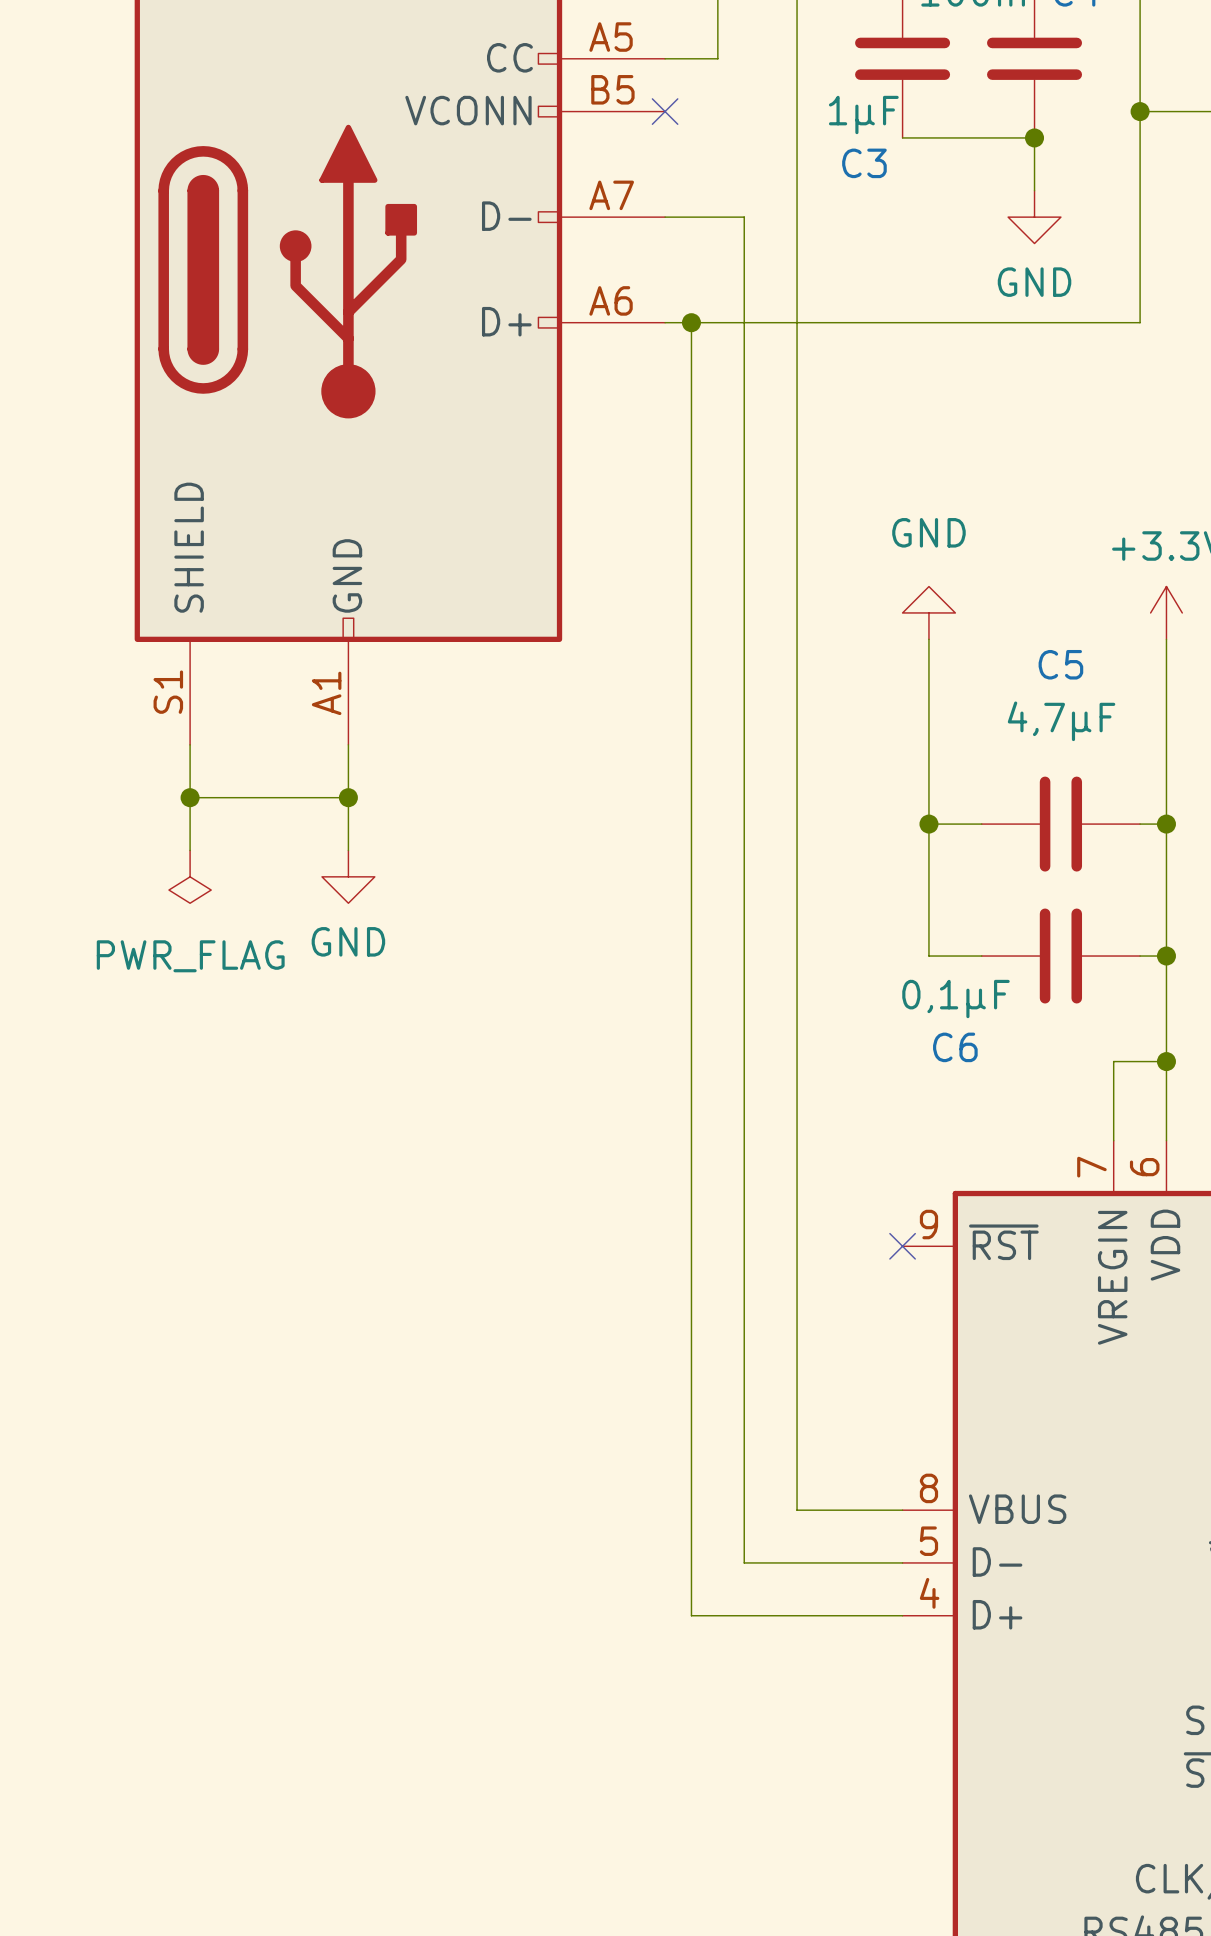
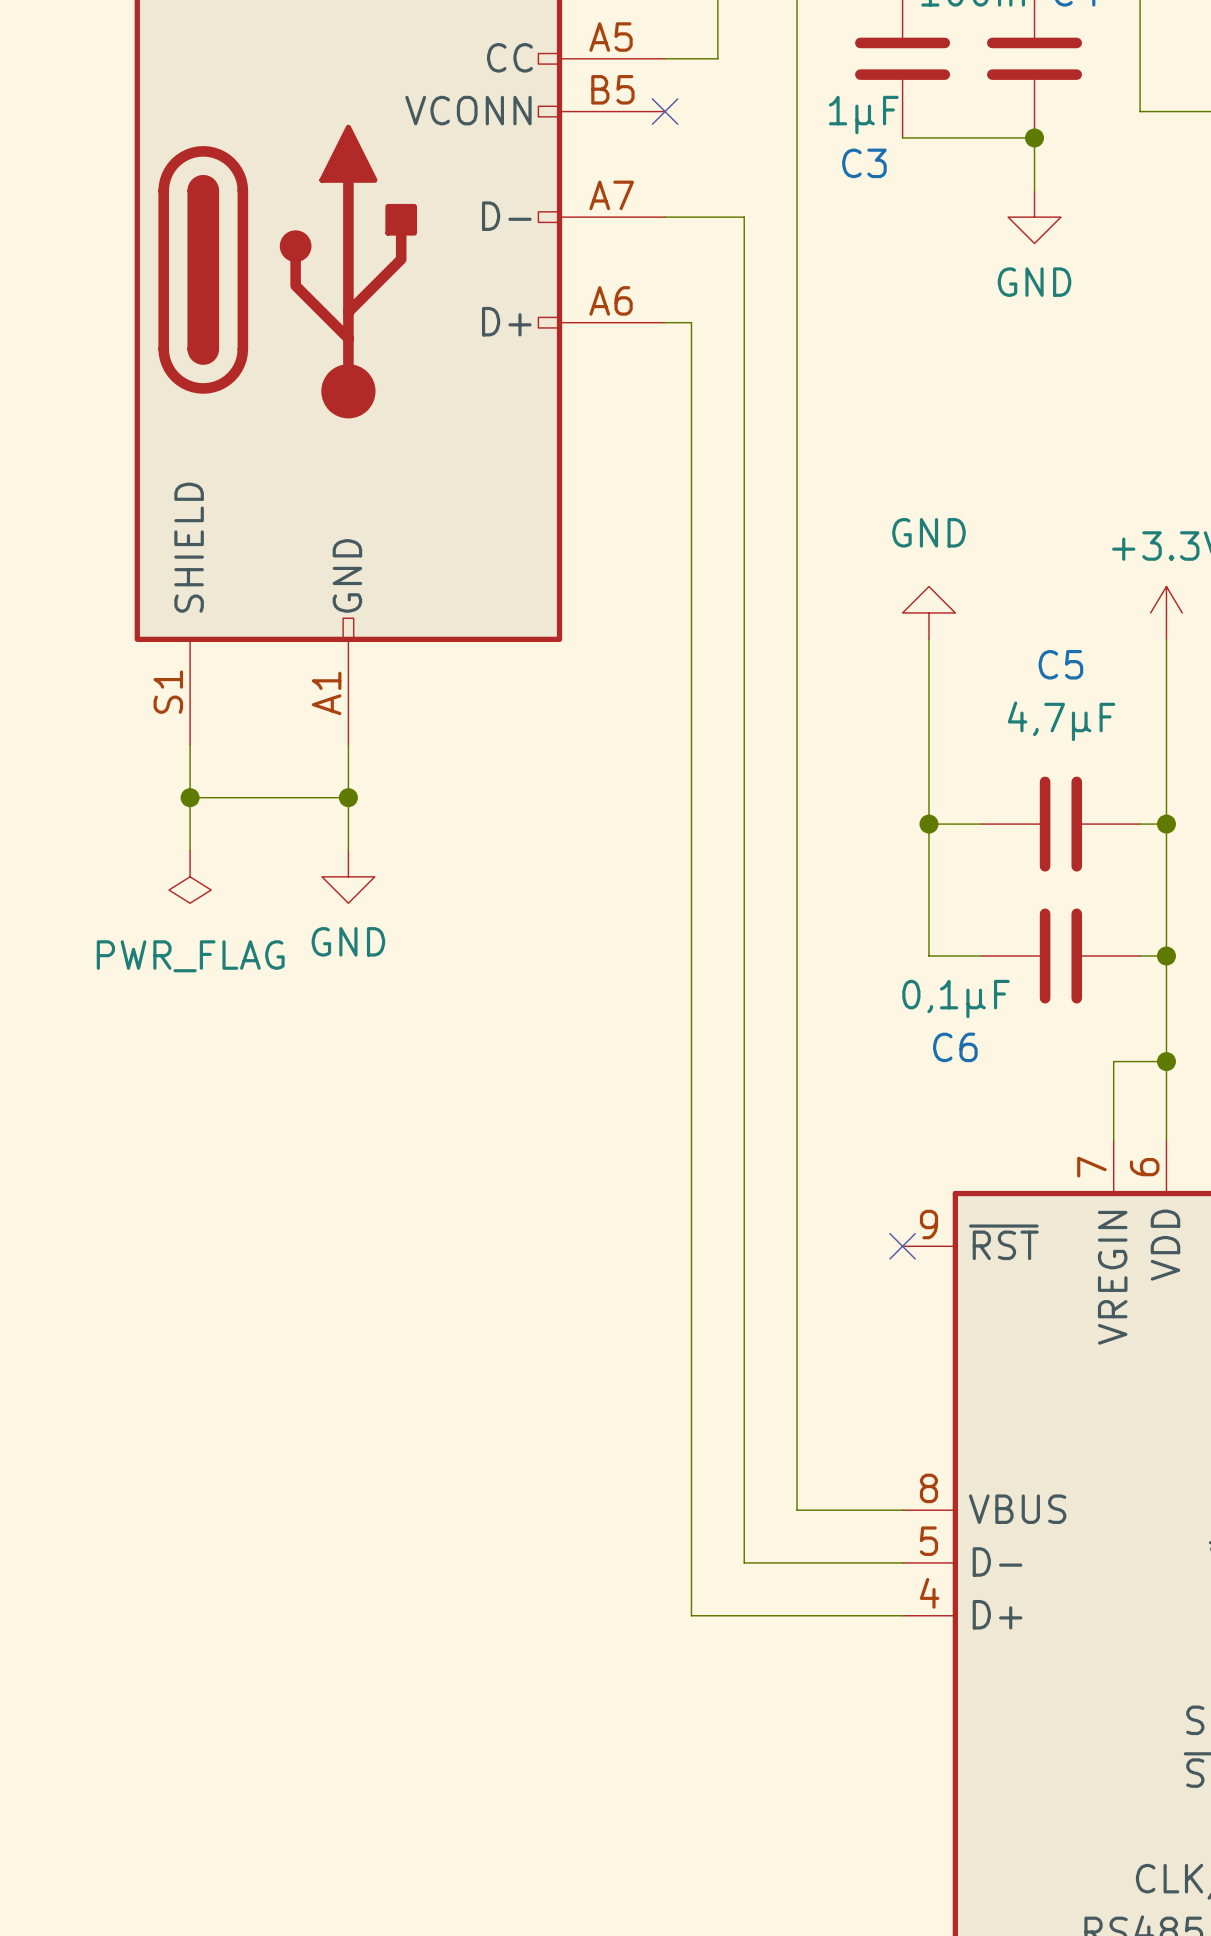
wire: (1140, 111) (1140, 322) (691, 322) -> none
junction: (1140, 111) -> none
junction: (691, 322) -> none

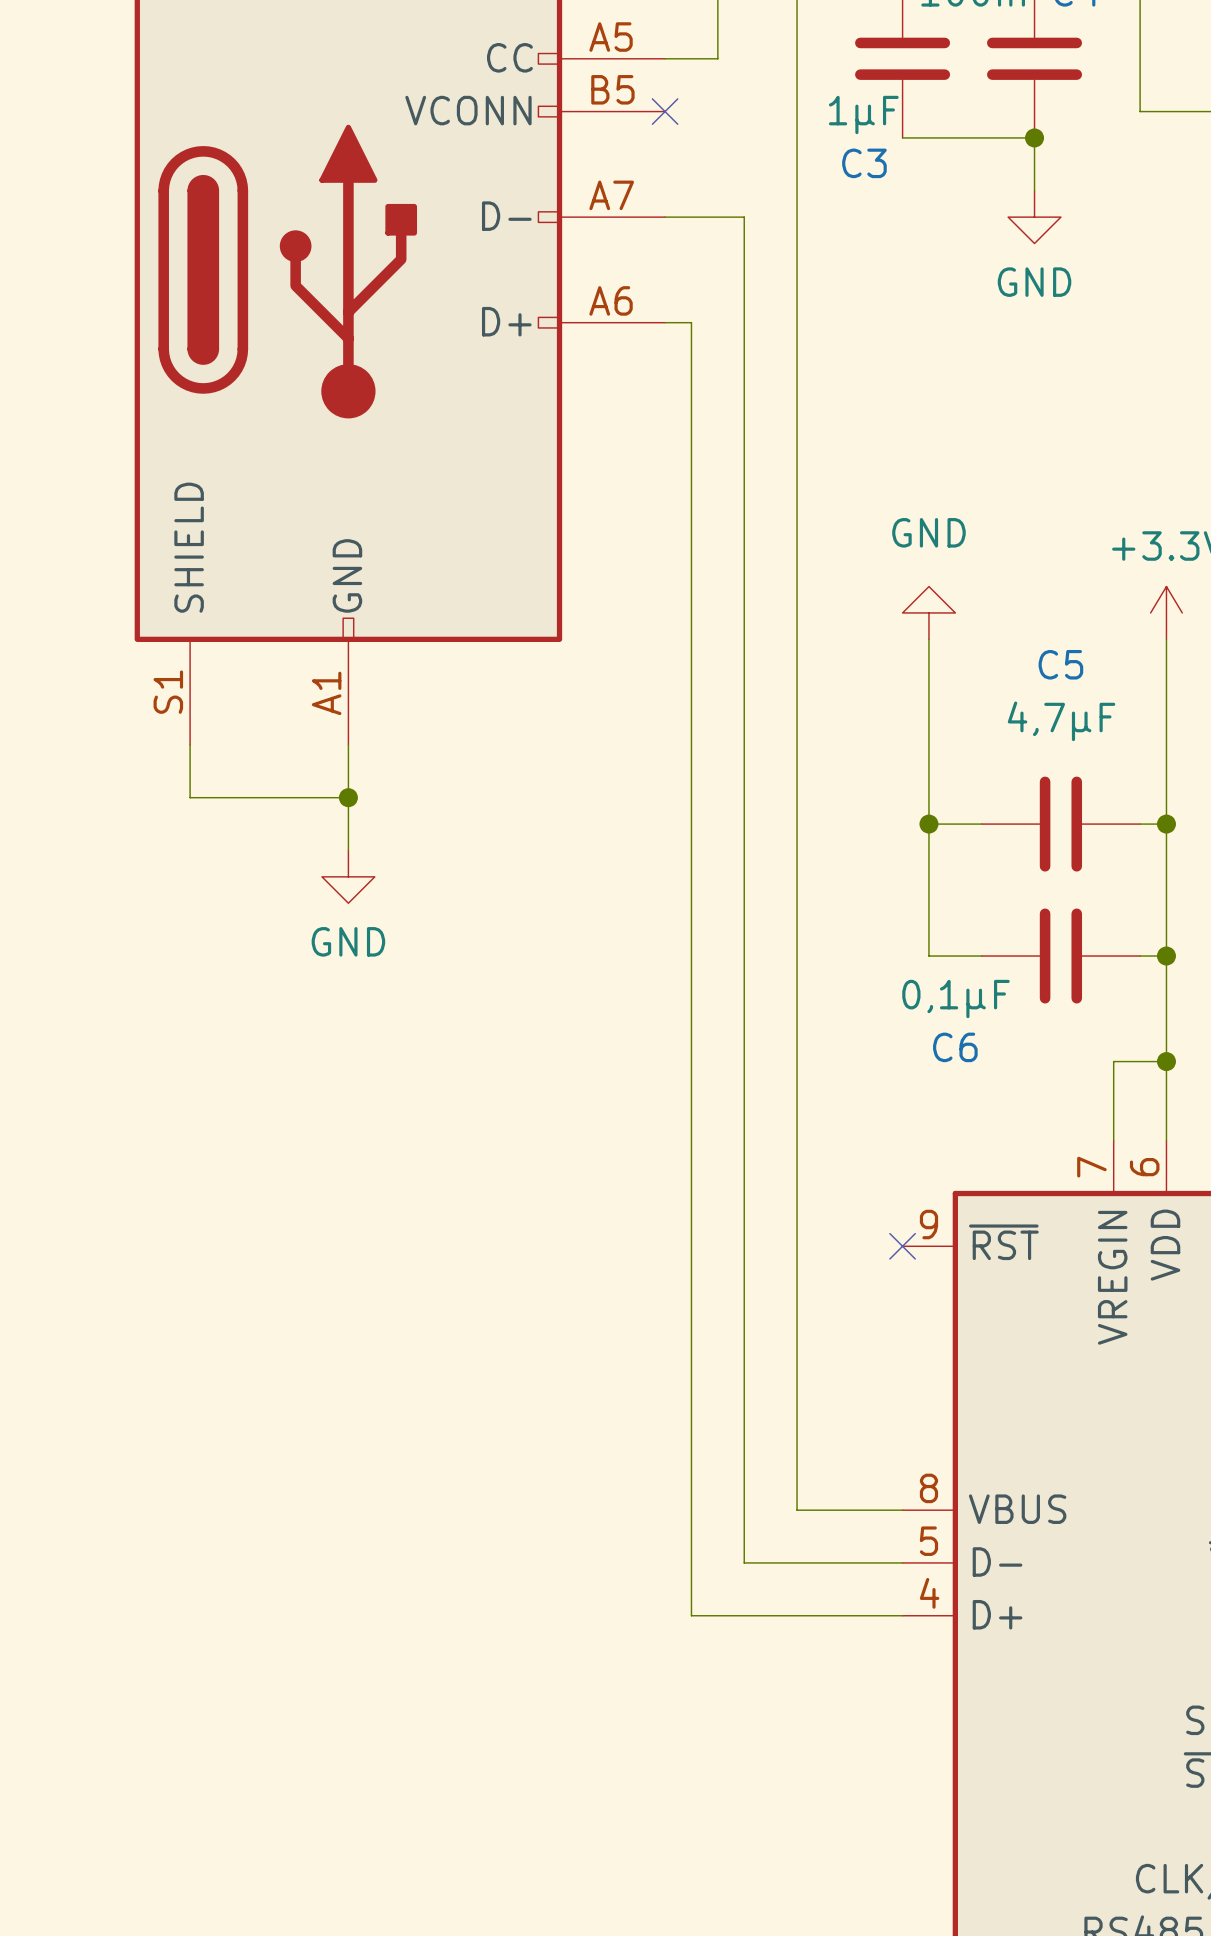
wire: (190, 797) (190, 850) -> none
junction: (190, 797) -> none
power symbol: PWR_FLAG (190, 876) -> none

